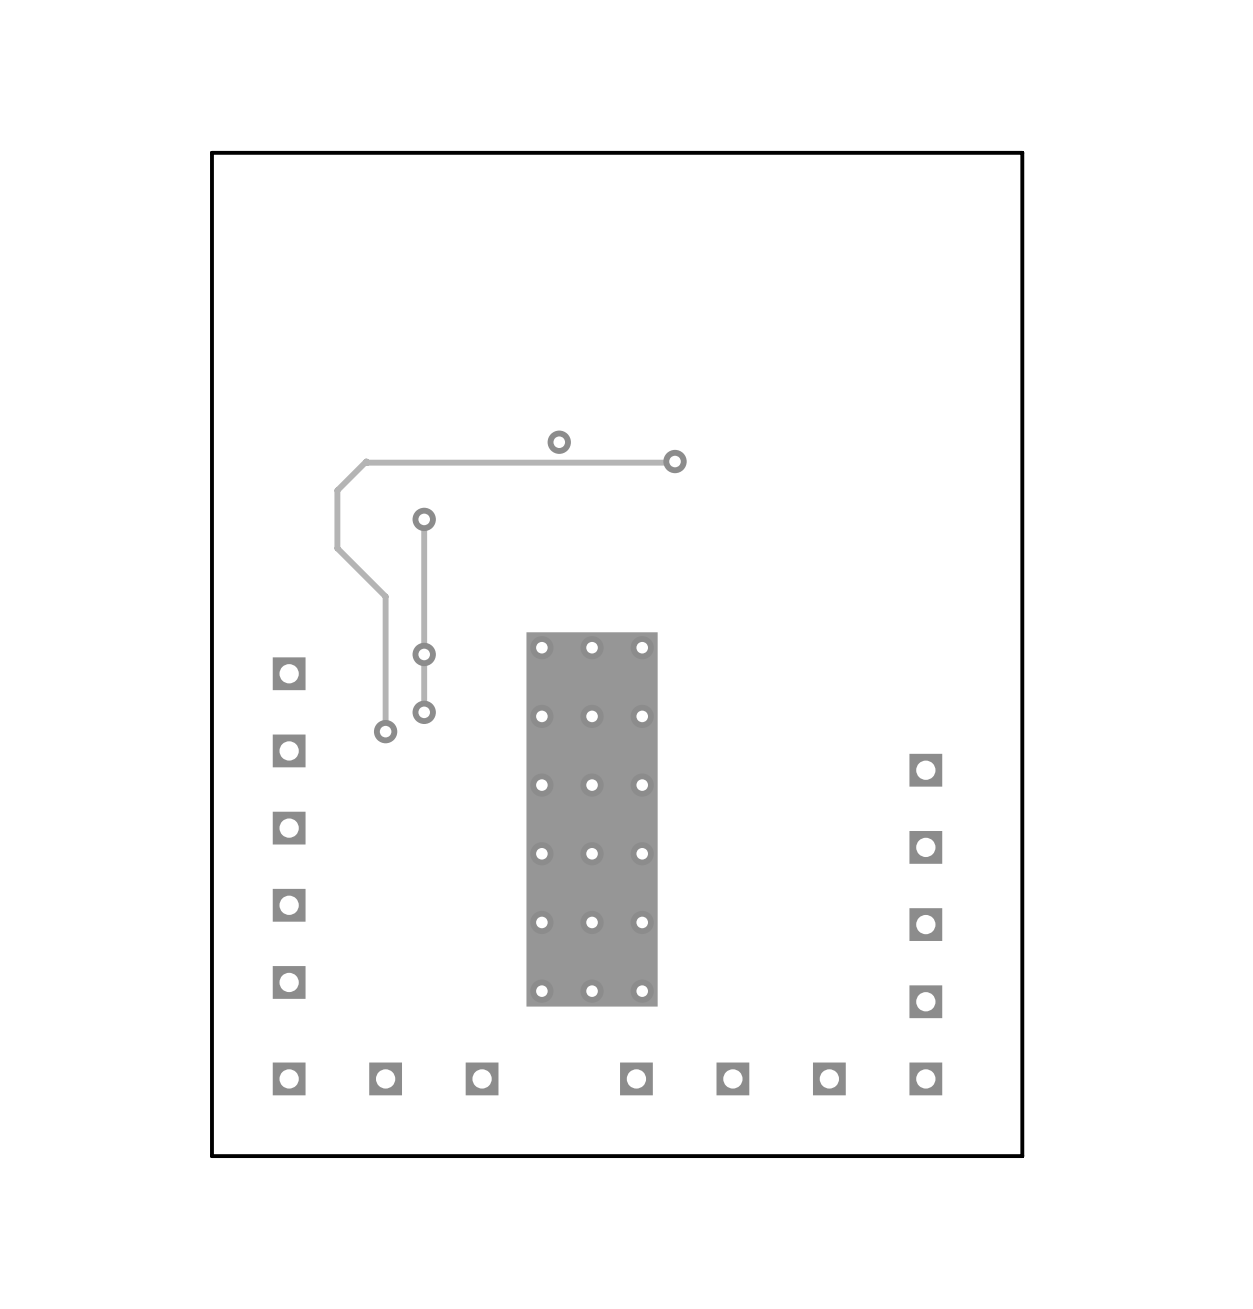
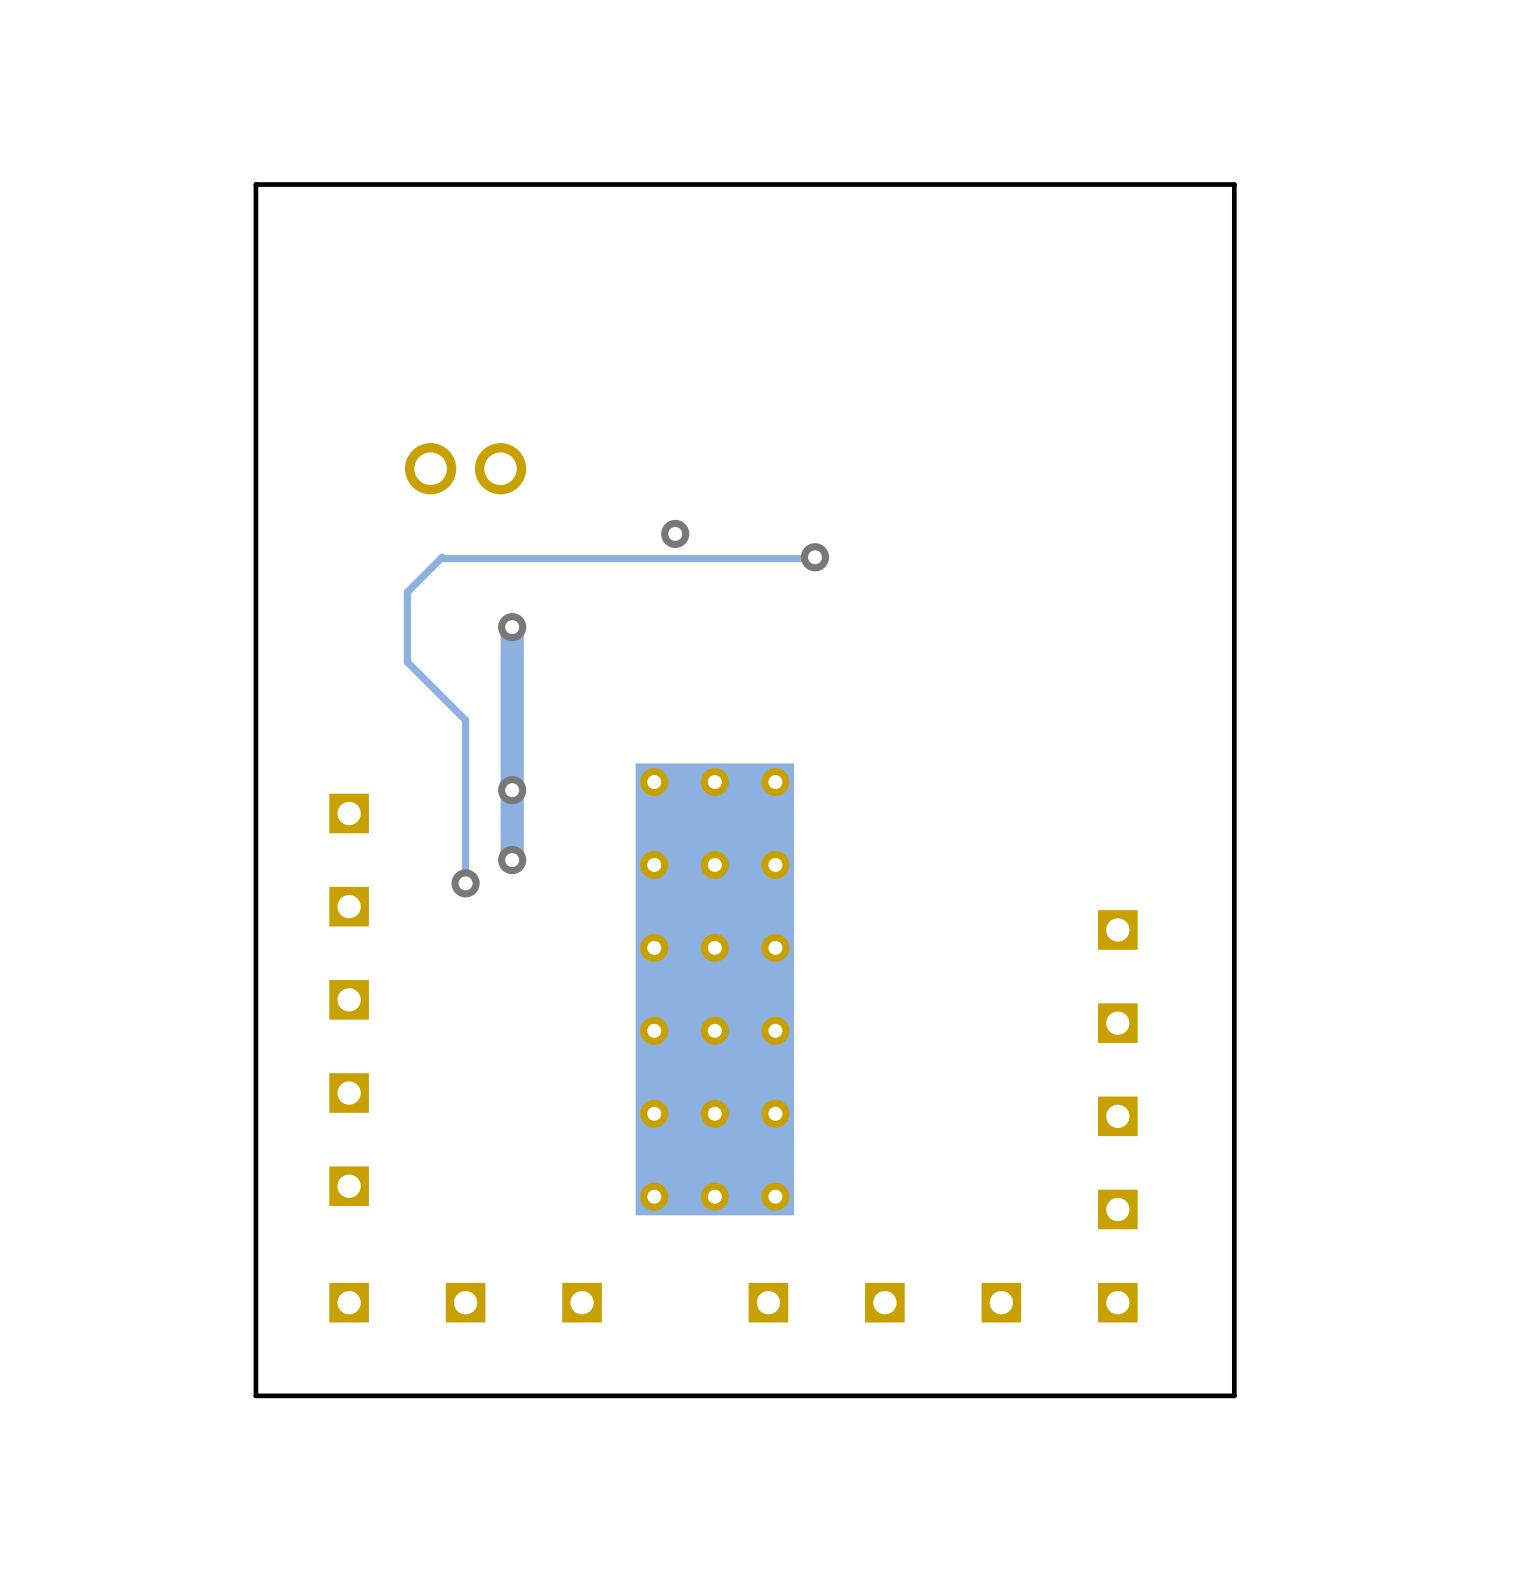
part: none -> (465, 468)
track width: thin (424, 519) (424, 712) -> thick (512, 627) (512, 860)

